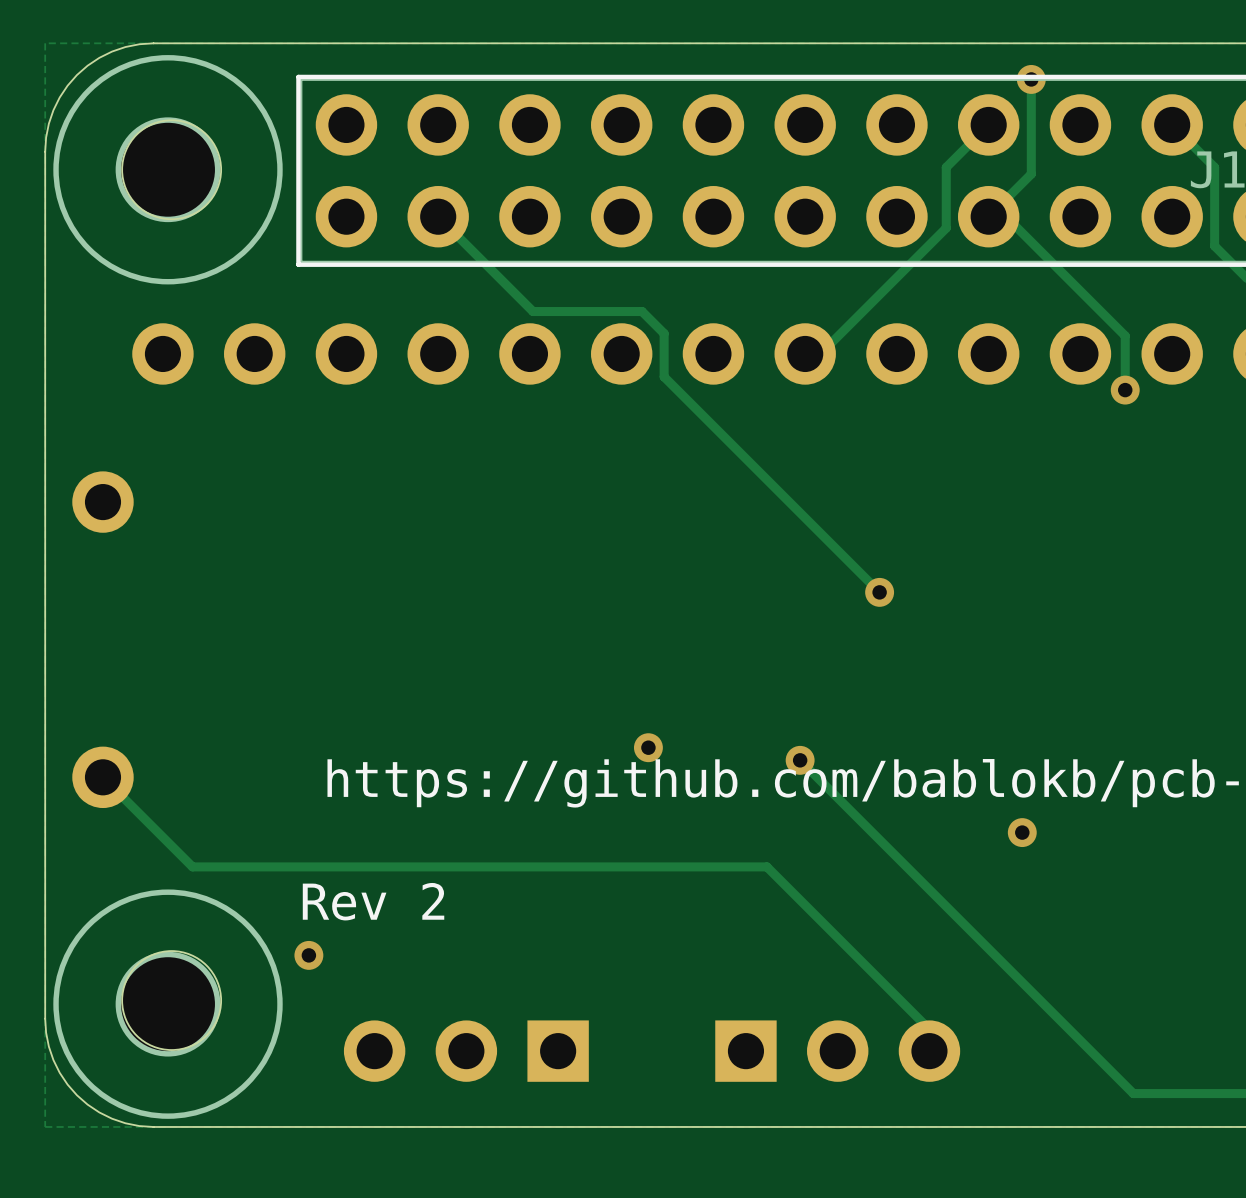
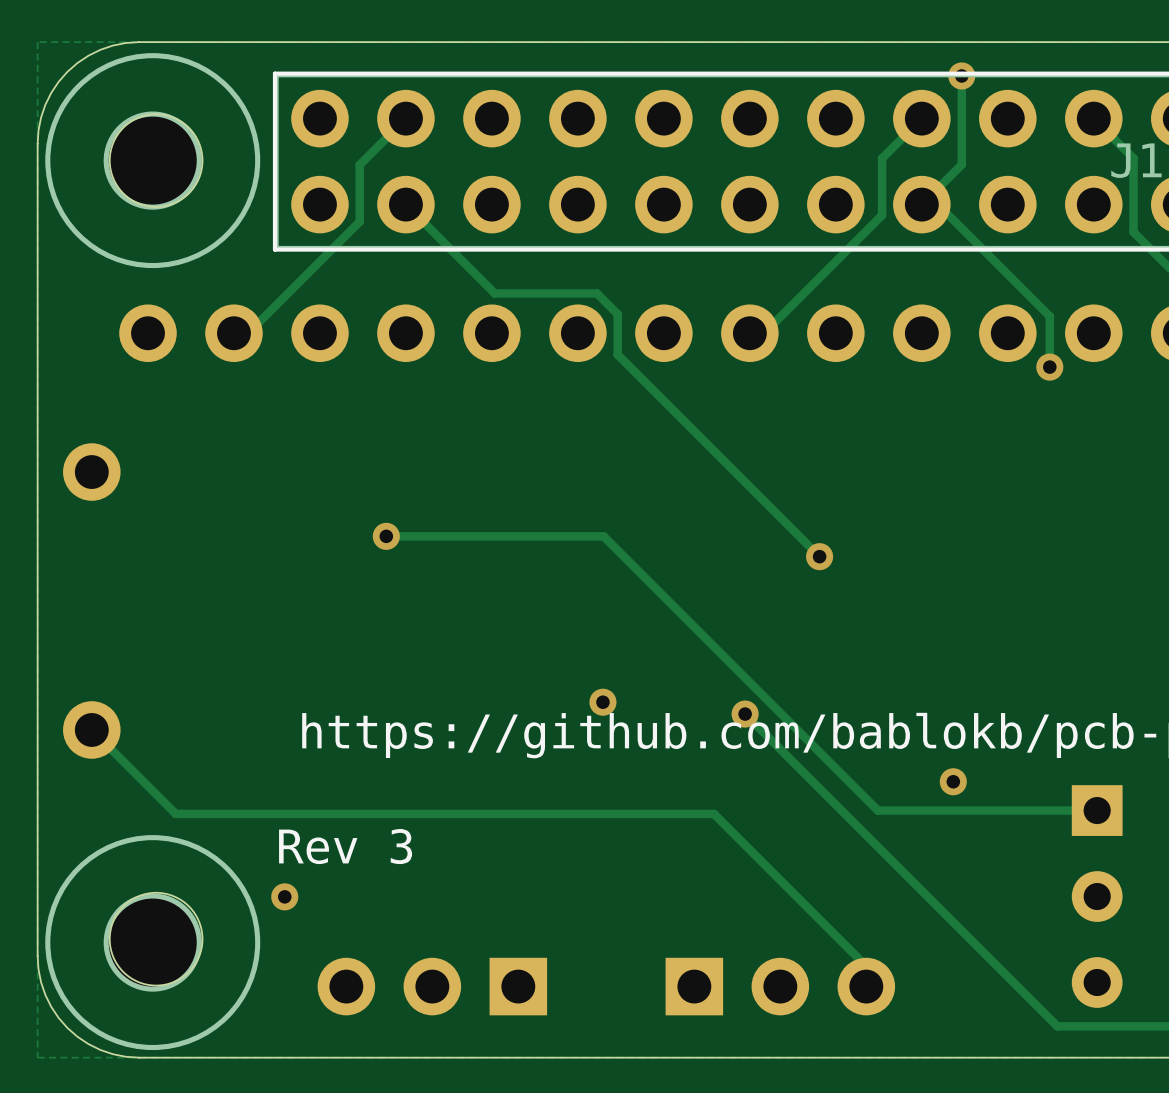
track: none -> (405, 118) (359, 164) (359, 221) (248, 333)
track: none -> (386, 536) (603, 536) (877, 810) (1097, 810)
via: none -> (386, 536)
text: Rev 2 (373, 901) -> Rev 3 (345, 846)
part: none -> (1097, 896)

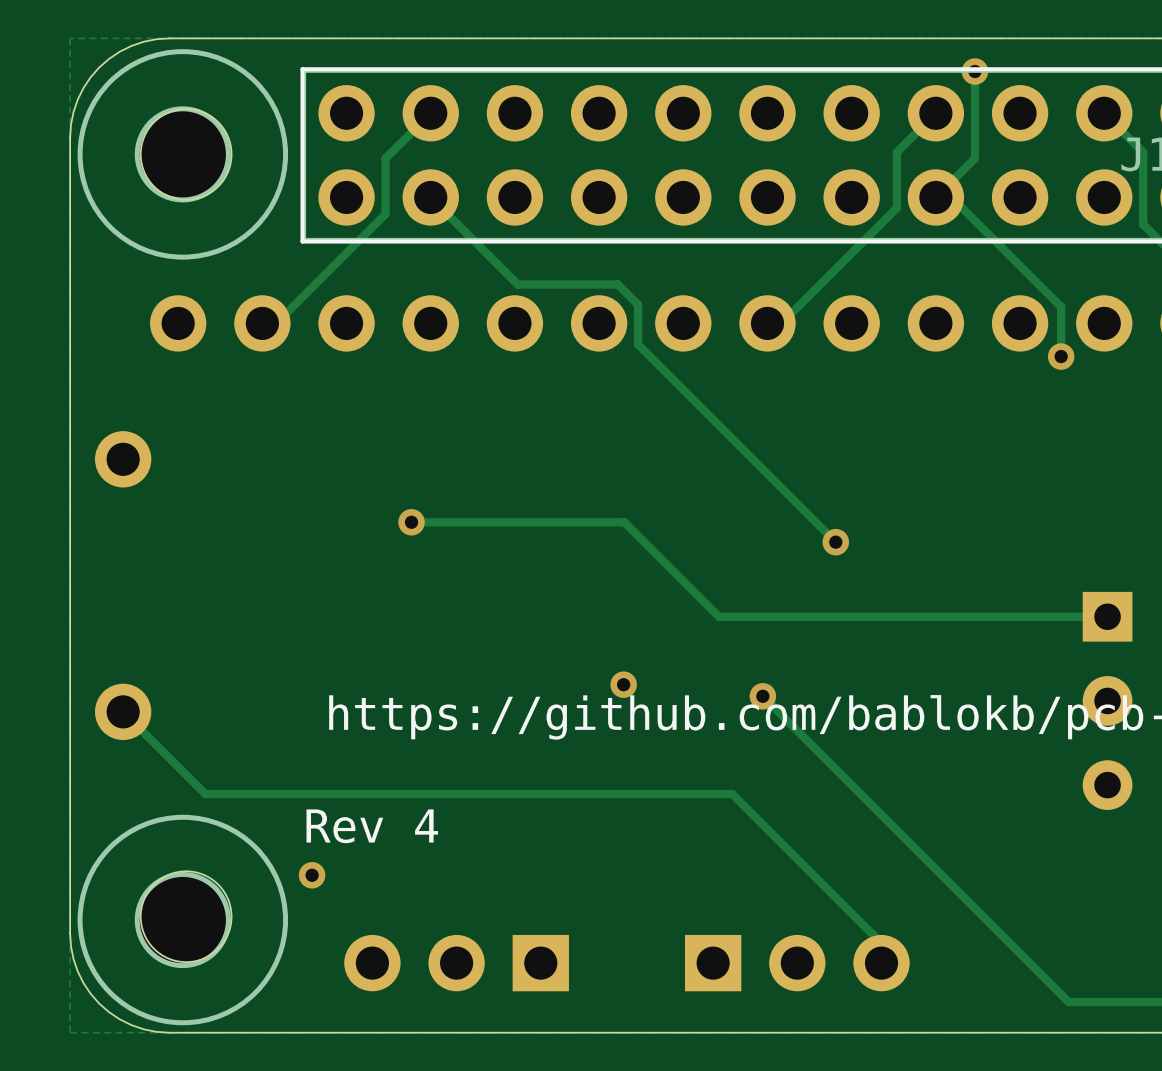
track: (700, 632) (877, 810) (1097, 810) -> (718, 616) (1107, 616)
via: (953, 781) -> none
text: Rev 3 (345, 846) -> Rev 4 (372, 826)
part position: (1097, 896) -> (1107, 700)

